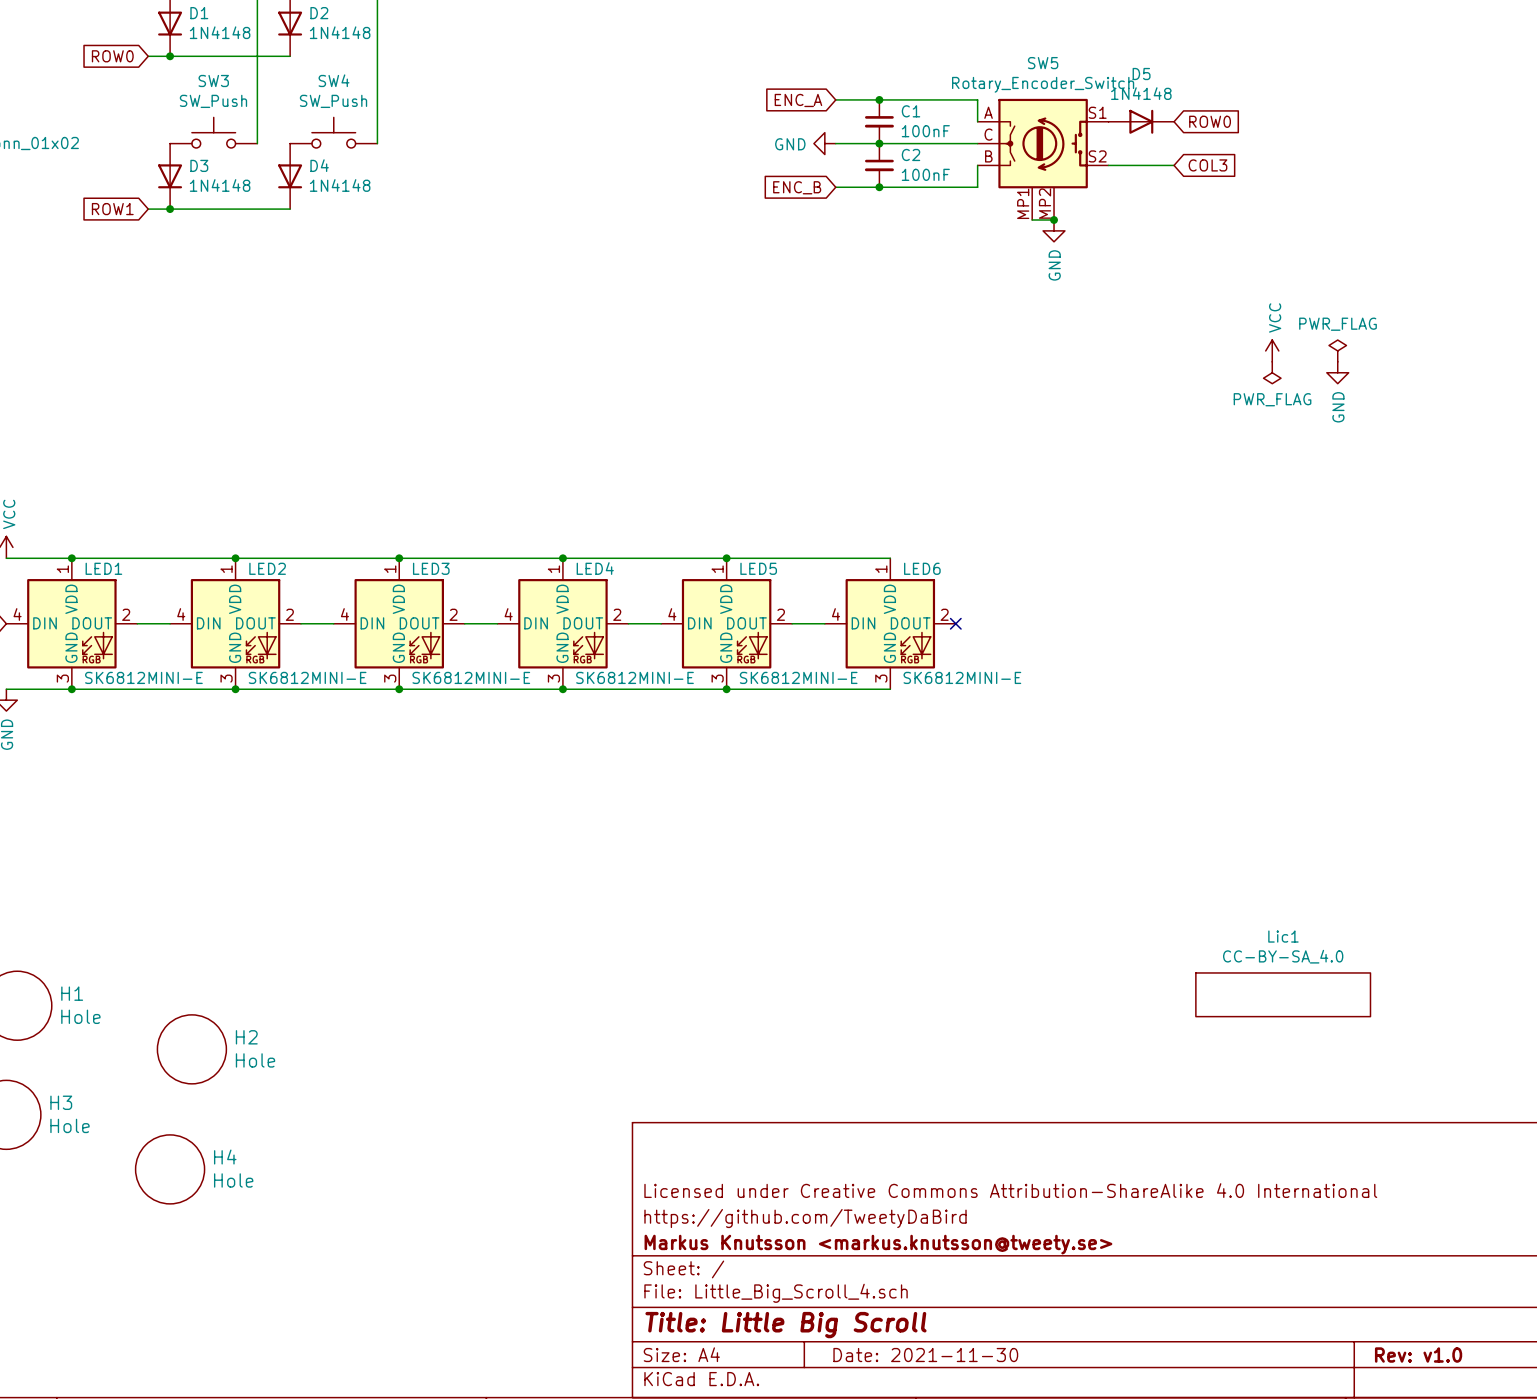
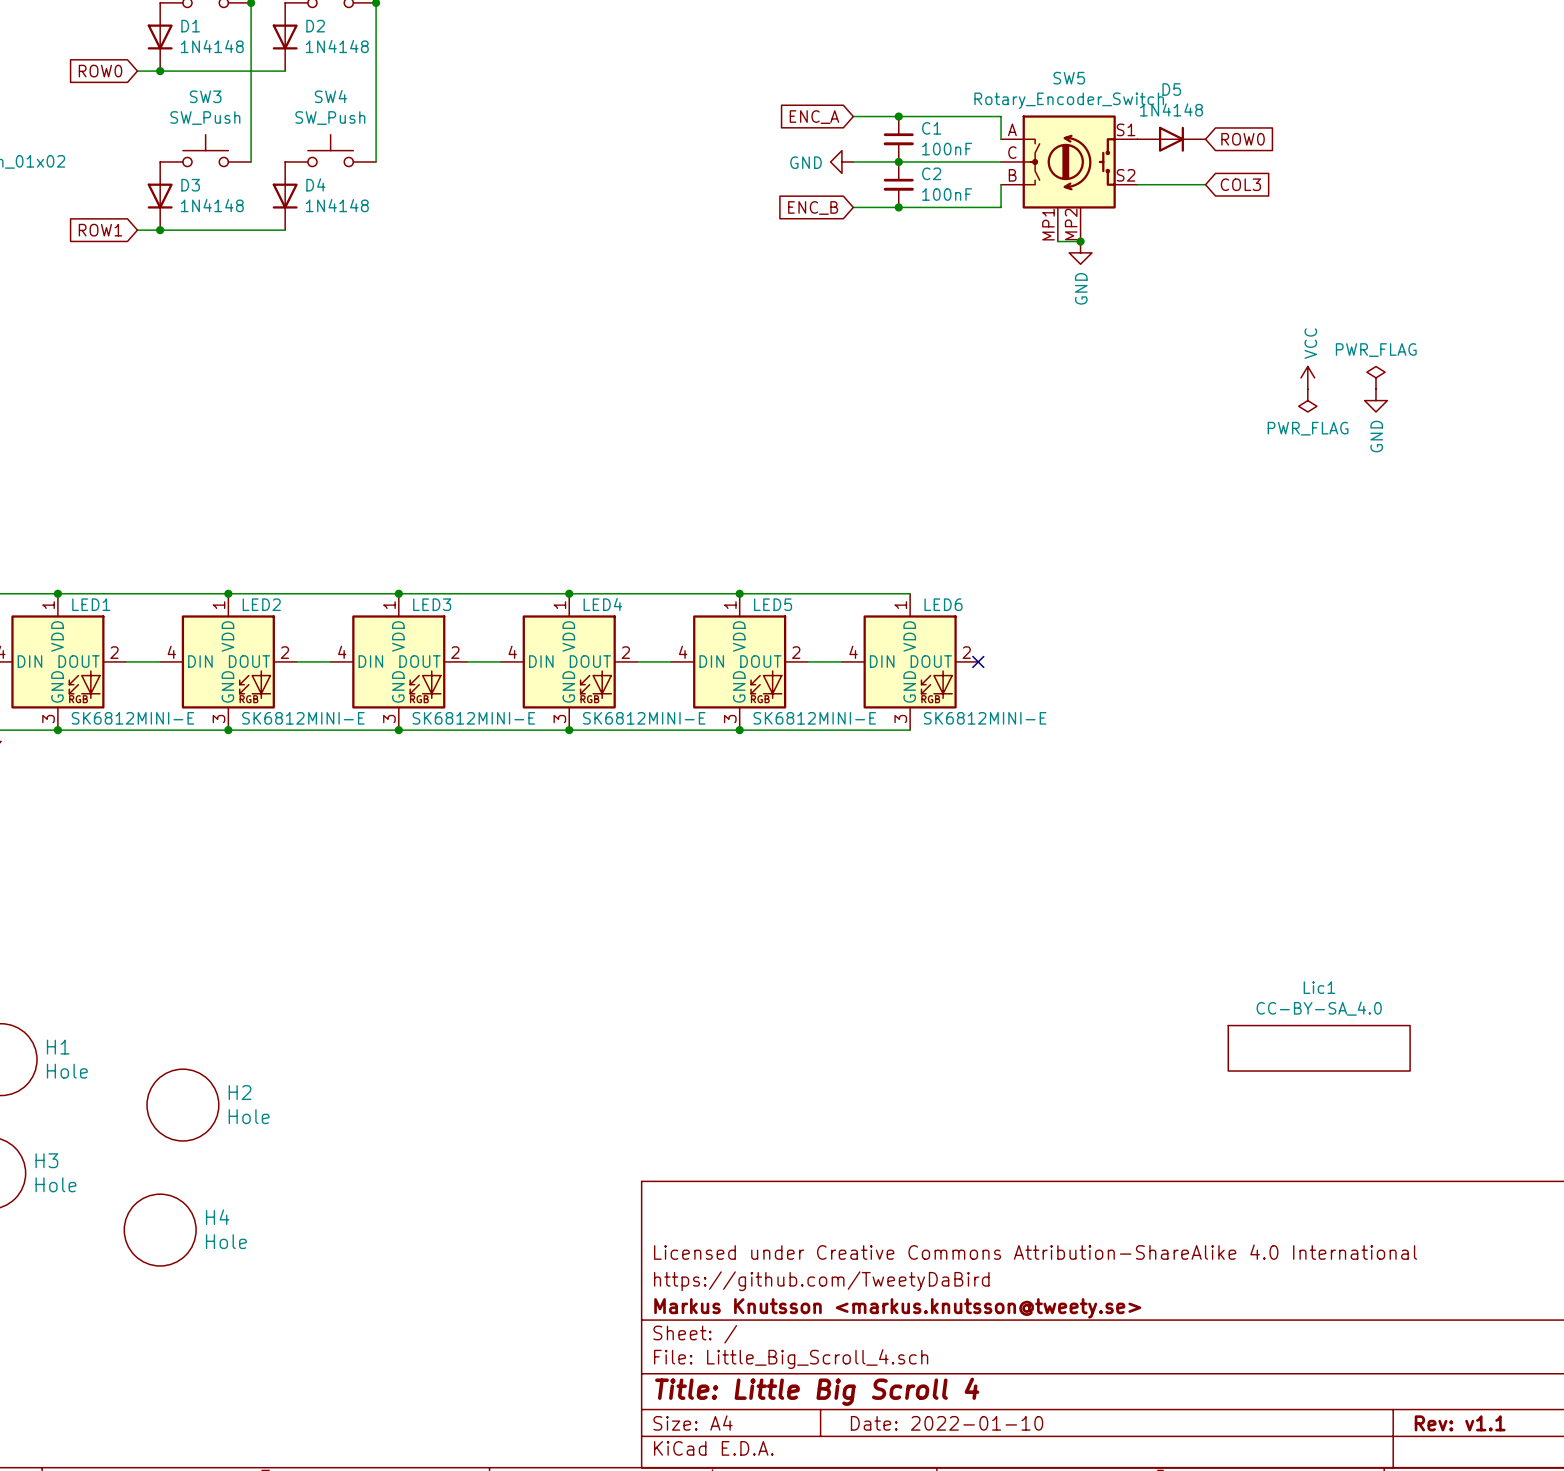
title block: Title: Little Big Scroll (785, 1325) -> Title: Little Big Scroll 4 (817, 1391)
title block: Date: 2021-11-30 (925, 1355) -> Date: 2022-01-10 (947, 1423)
title block: Rev: v1.0 (1418, 1355) -> Rev: v1.1 (1460, 1423)

